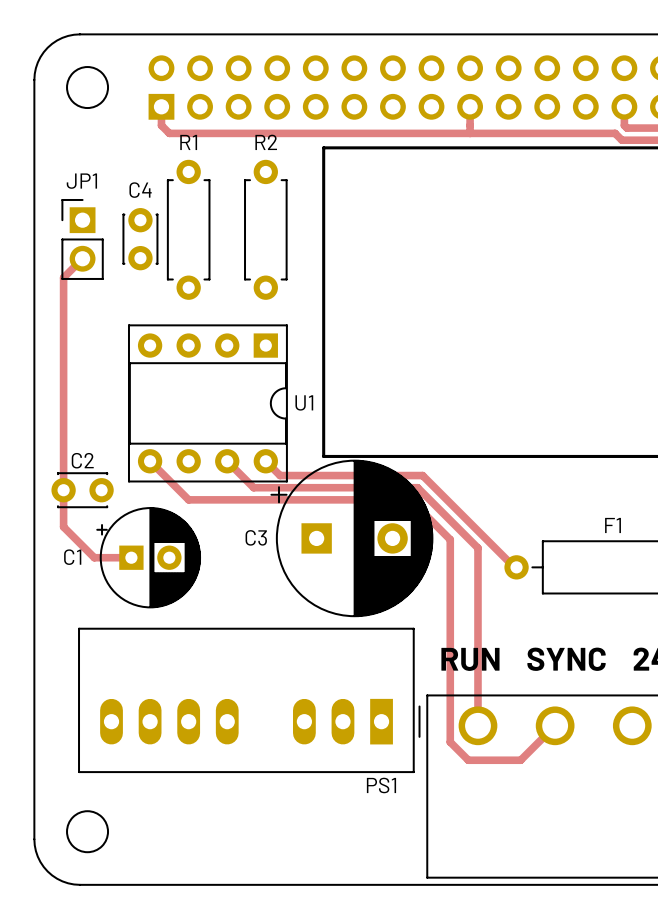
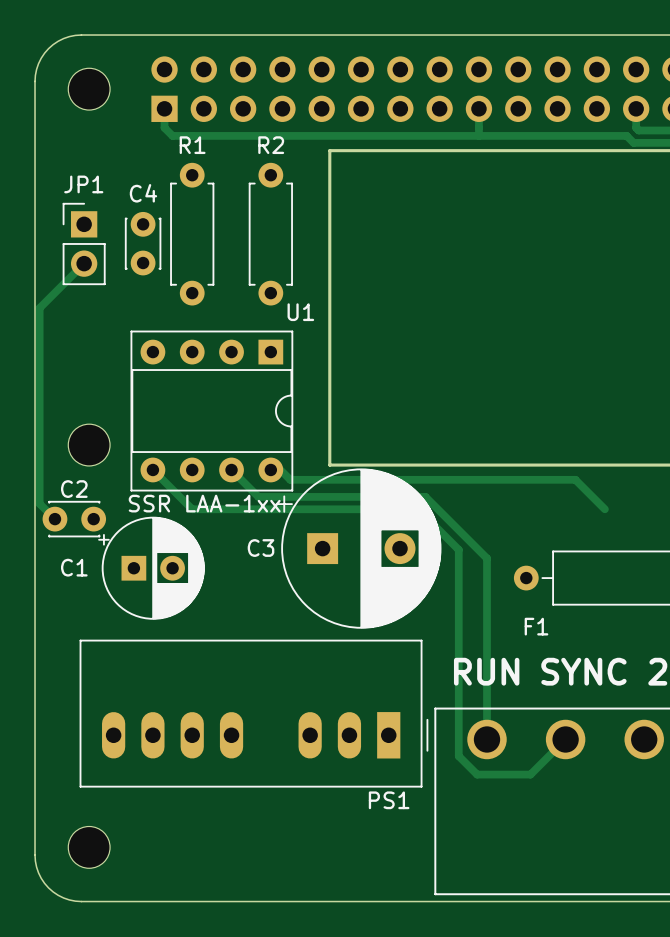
track: (63, 277) (63, 526) (94, 557) (131, 557) -> (64, 282) (39, 308) (39, 503) (54, 519)
U1 name position: U1 (304, 402) -> U1 (300, 312)
part: none -> (89, 445)
track: (265, 461) (280, 475) (422, 475) (516, 567) -> none
track: none -> (280, 469) (290, 479) (575, 479) (604, 509)
C2 position: (82, 490) -> (74, 519)
text: none -> SSR LAA-1xx (204, 503)
F1 name position: F1 (613, 525) -> F1 (536, 626)

